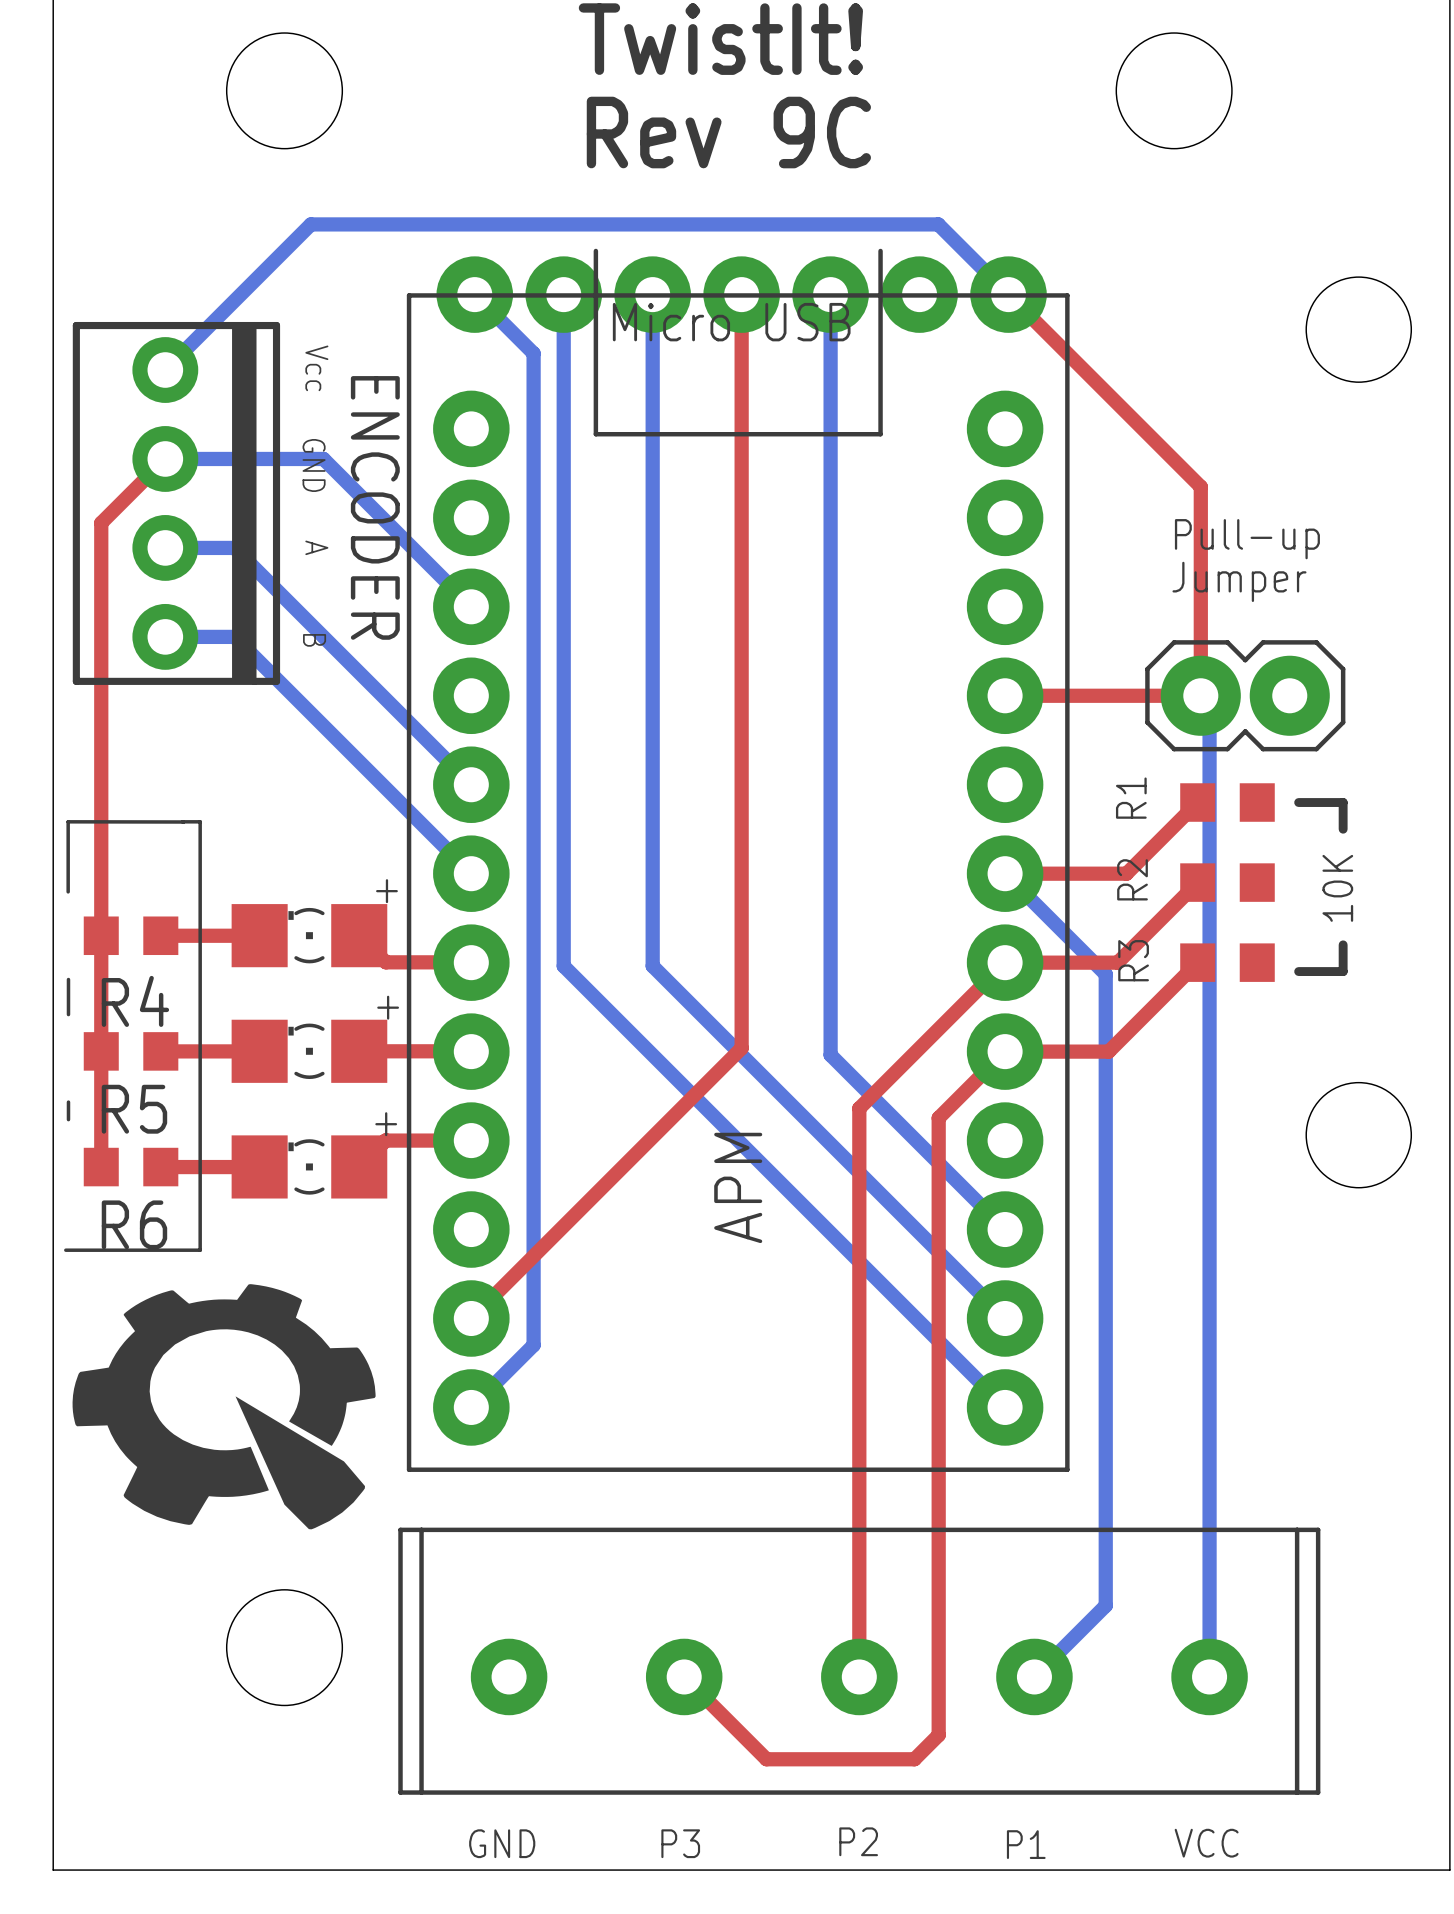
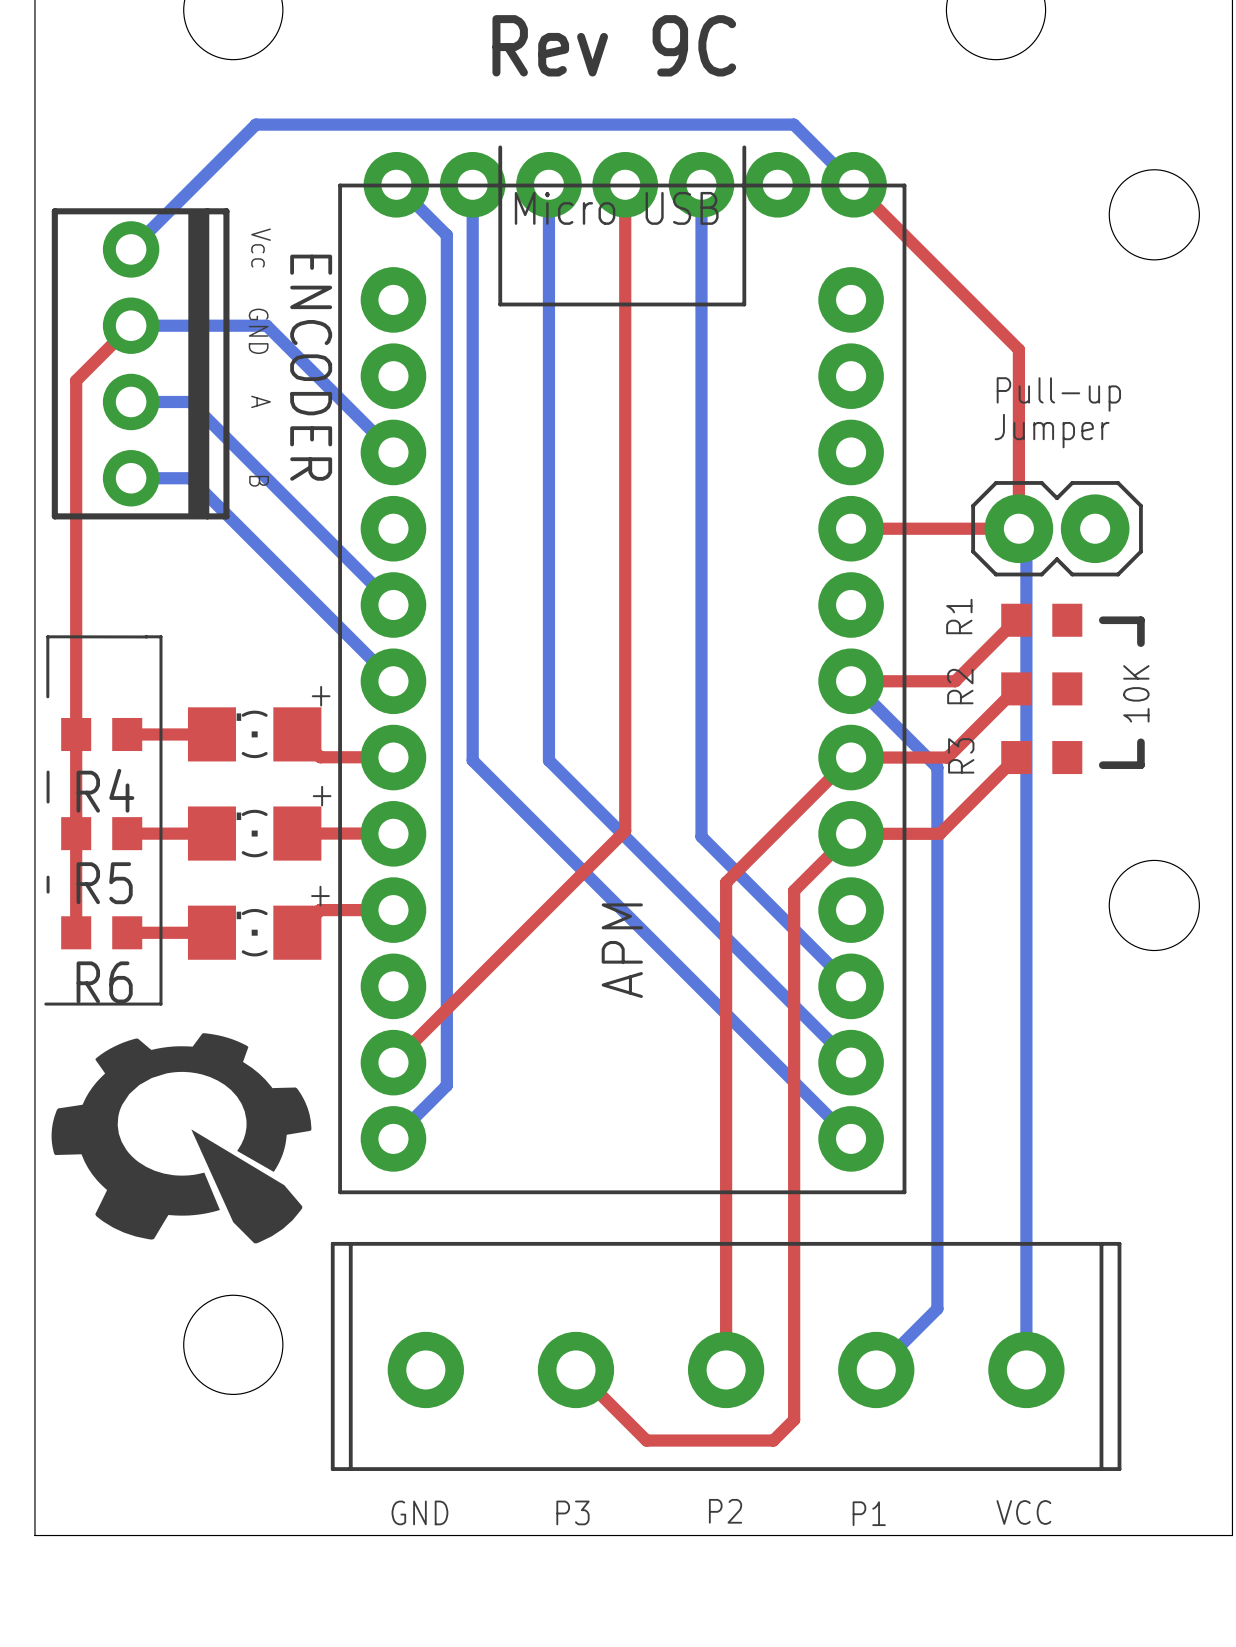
part footprint: [398, 1527, 1321, 1795] -> [330, 1241, 1122, 1471]

